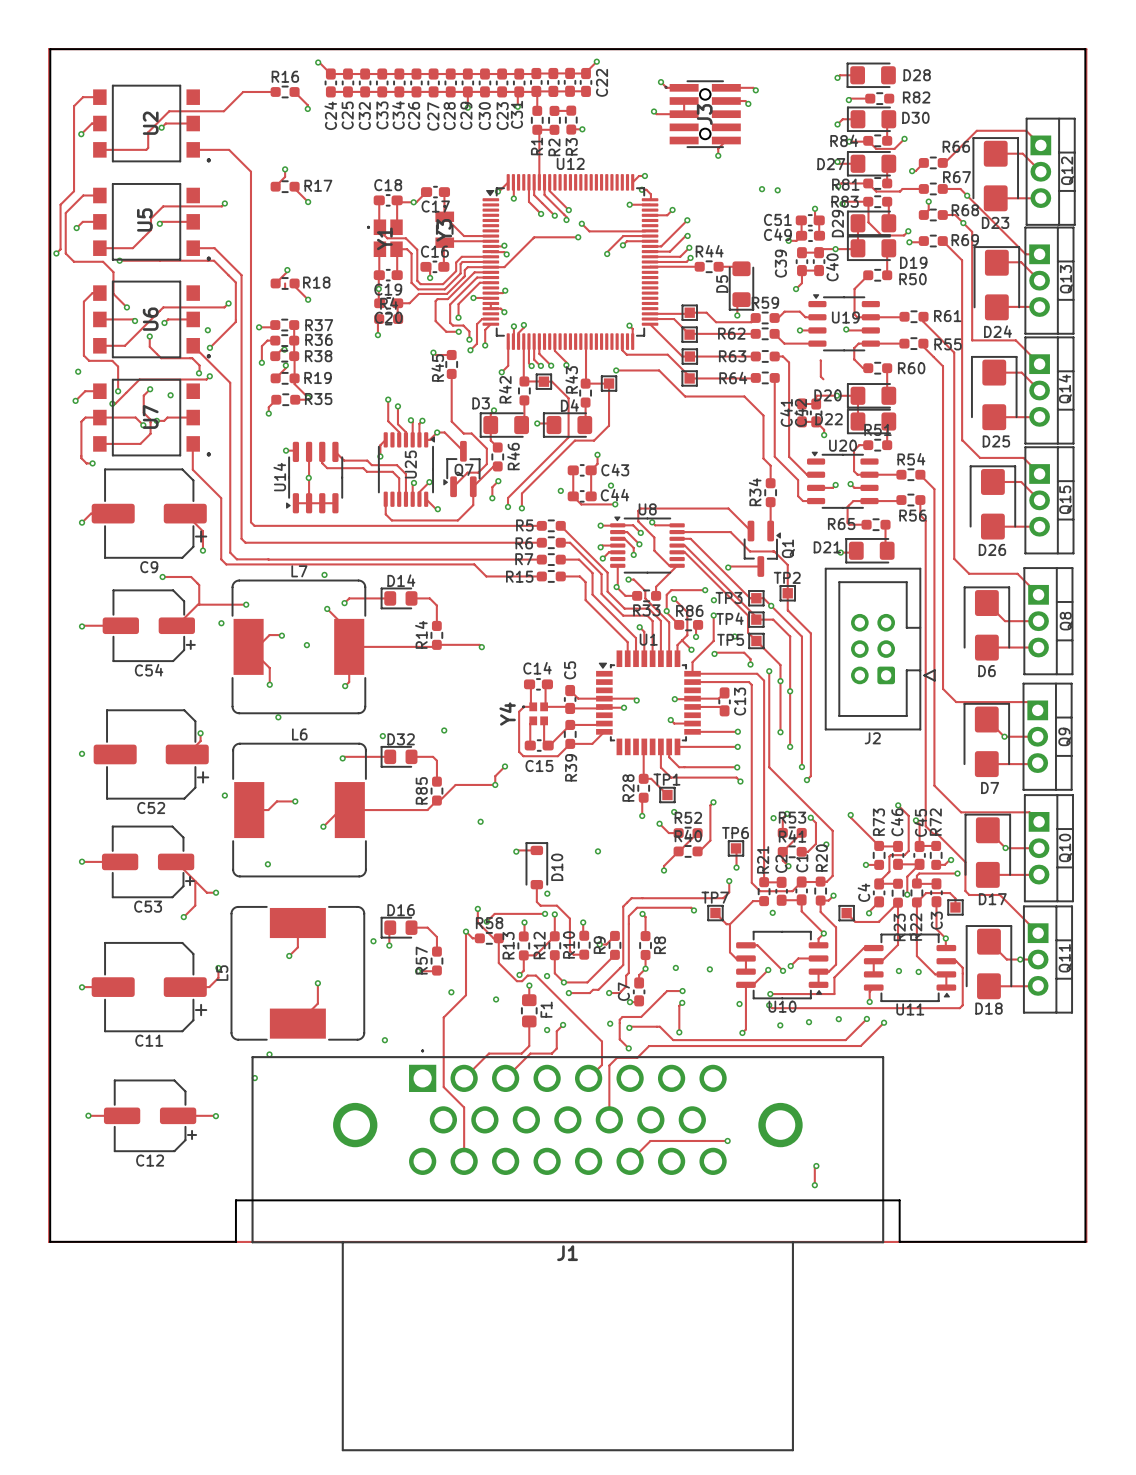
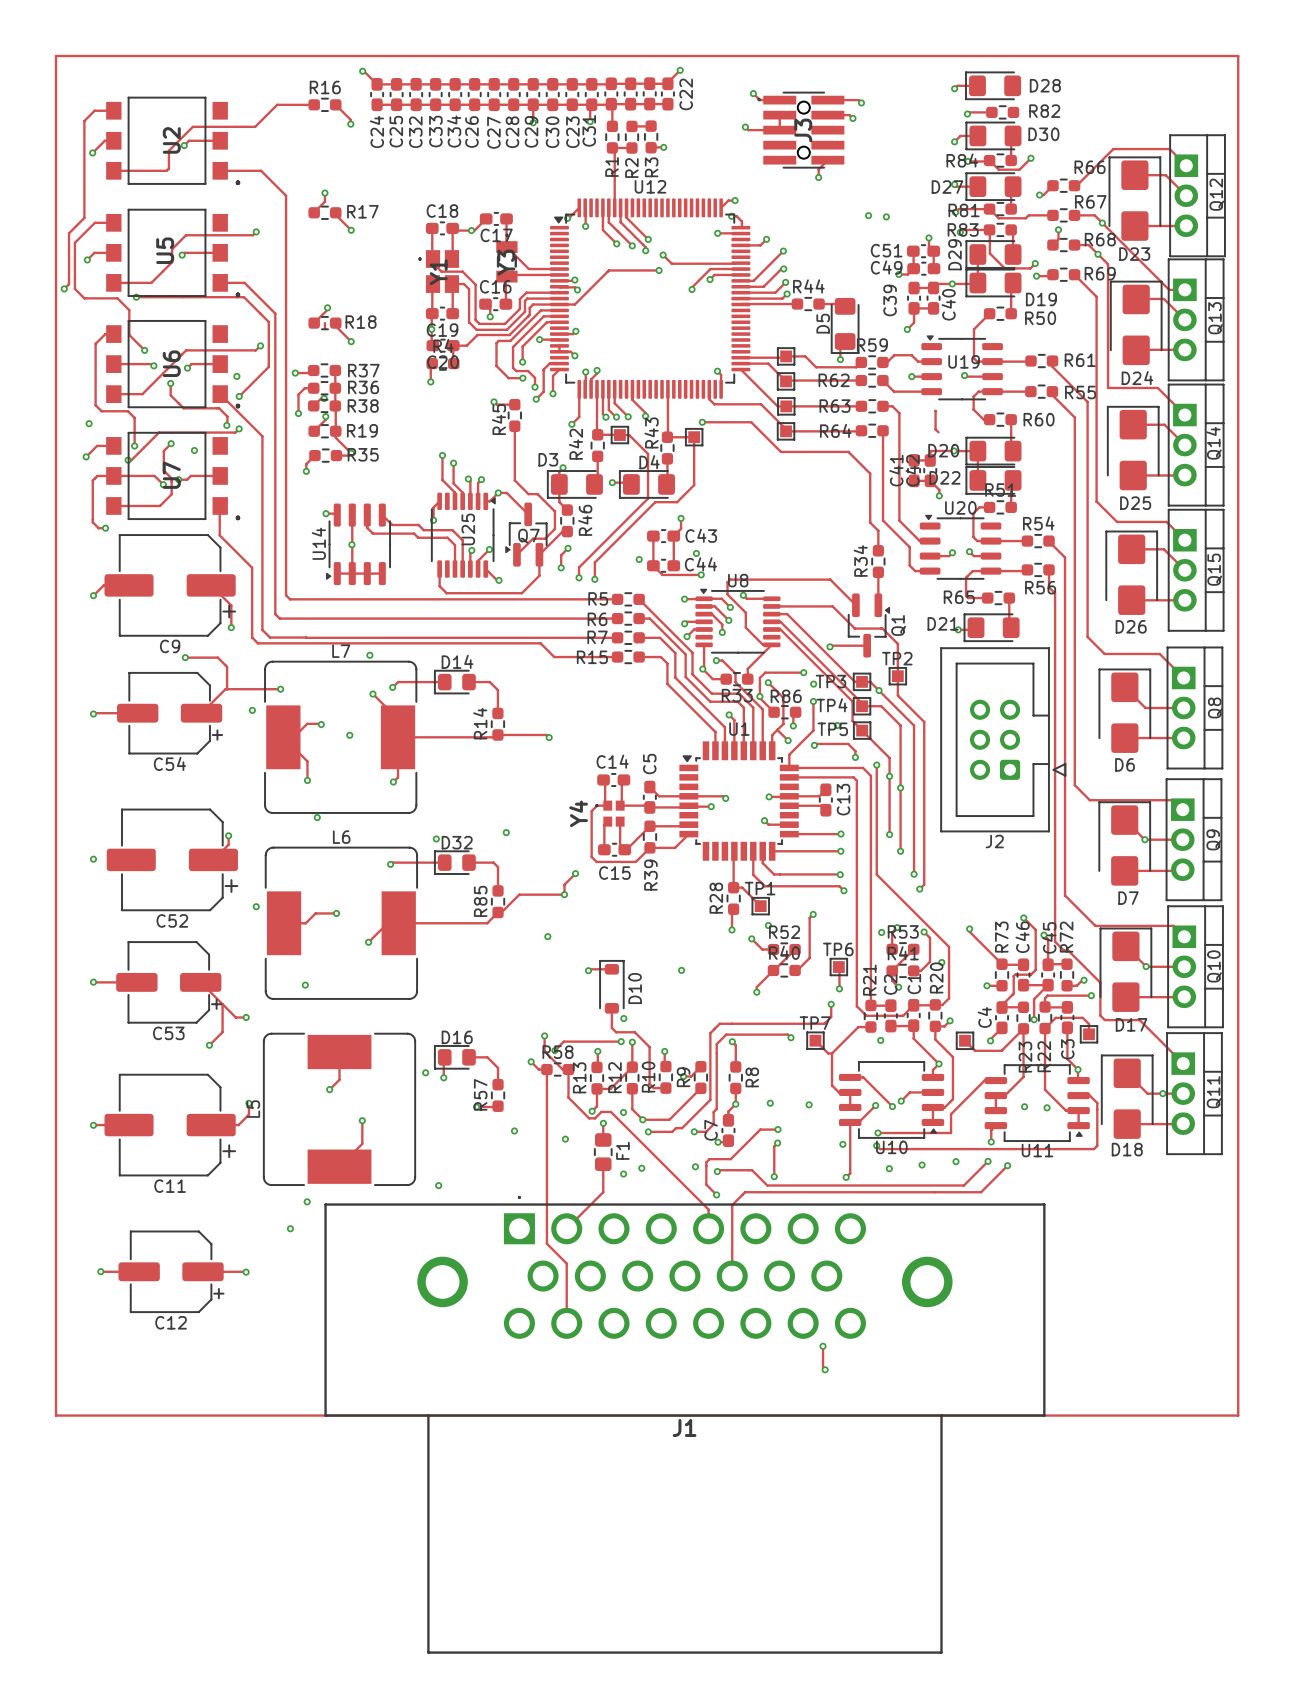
board edge: (50, 49) (50, 1241) (235, 1241) (235, 1200) (899, 1200) (899, 1241) (1085, 1241) (1085, 49) (50, 49) -> none
track: (466, 931) (466, 995) (443, 1017) (443, 1087) (464, 1107) (464, 1161) -> none
track: none -> (546, 1069) (546, 1243) (566, 1263) (566, 1323)
track: (563, 1024) (556, 1031) (556, 1048) (552, 1053) (530, 1053) (505, 1078) -> none
track: (601, 1041) (601, 1065) (588, 1078) -> (686, 1187) (708, 1209) (708, 1228)
track: (653, 1046) (649, 1046) (637, 1057) (617, 1057) (609, 1065) (609, 1119) -> (745, 1192) (732, 1205) (732, 1276)
track: (521, 1053) (488, 1053) (464, 1078) -> (594, 1200) (566, 1228)
track: (727, 1140) (650, 1140) (630, 1161) -> none
via: (727, 1140) -> none
track: (816, 1166) (814, 1185) -> none
via: (816, 1166) -> none
track: none -> (823, 1346) (823, 1367) (825, 1369)
via: none -> (823, 1346)
via: (814, 1185) -> none
via: none -> (825, 1369)
J1 position: (567, 1250) -> (684, 1425)

